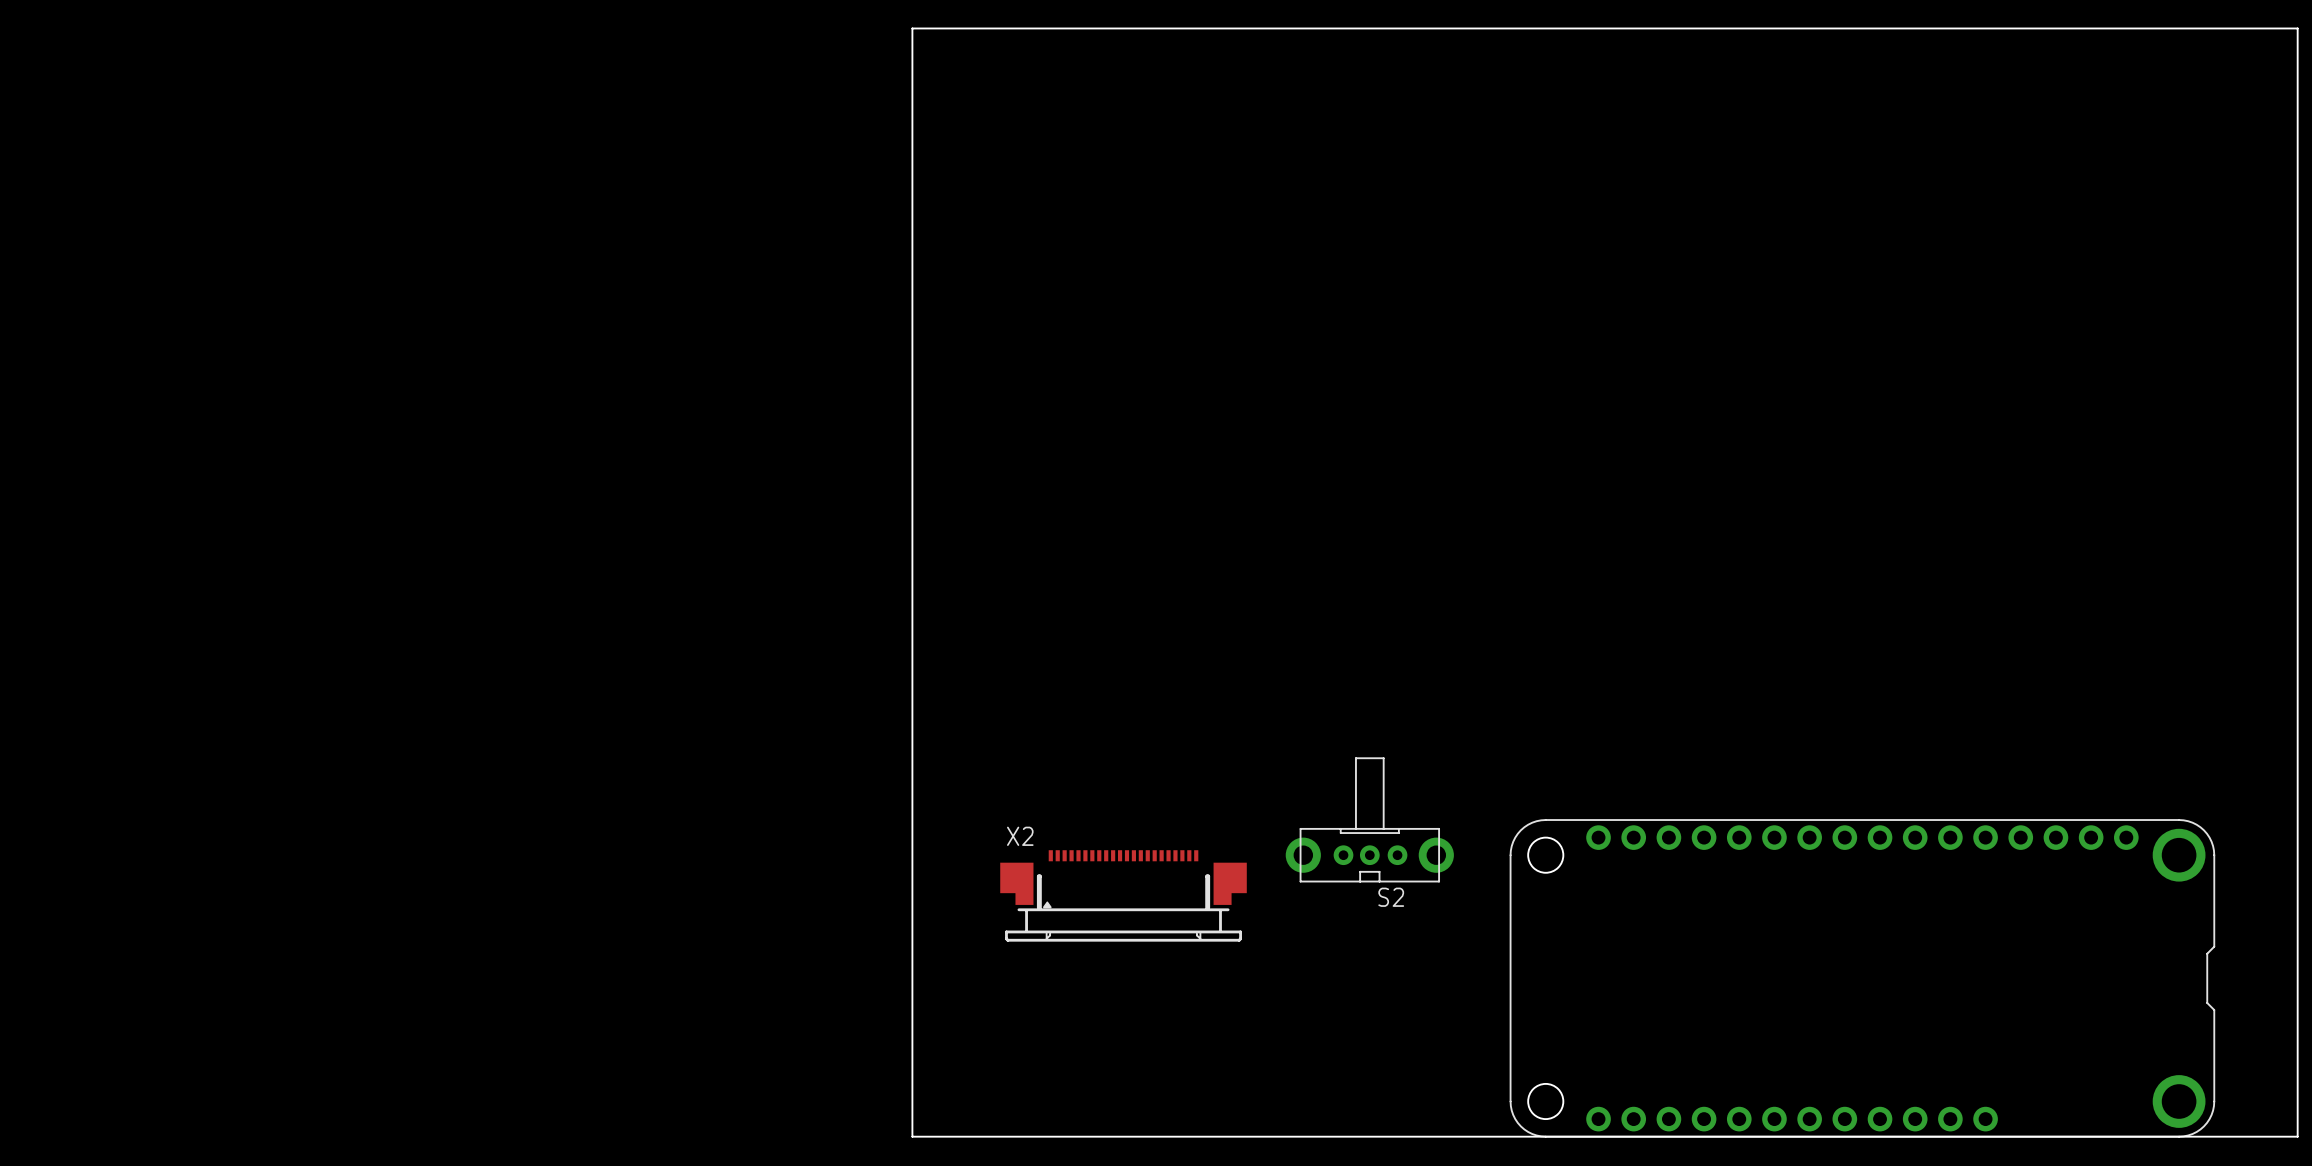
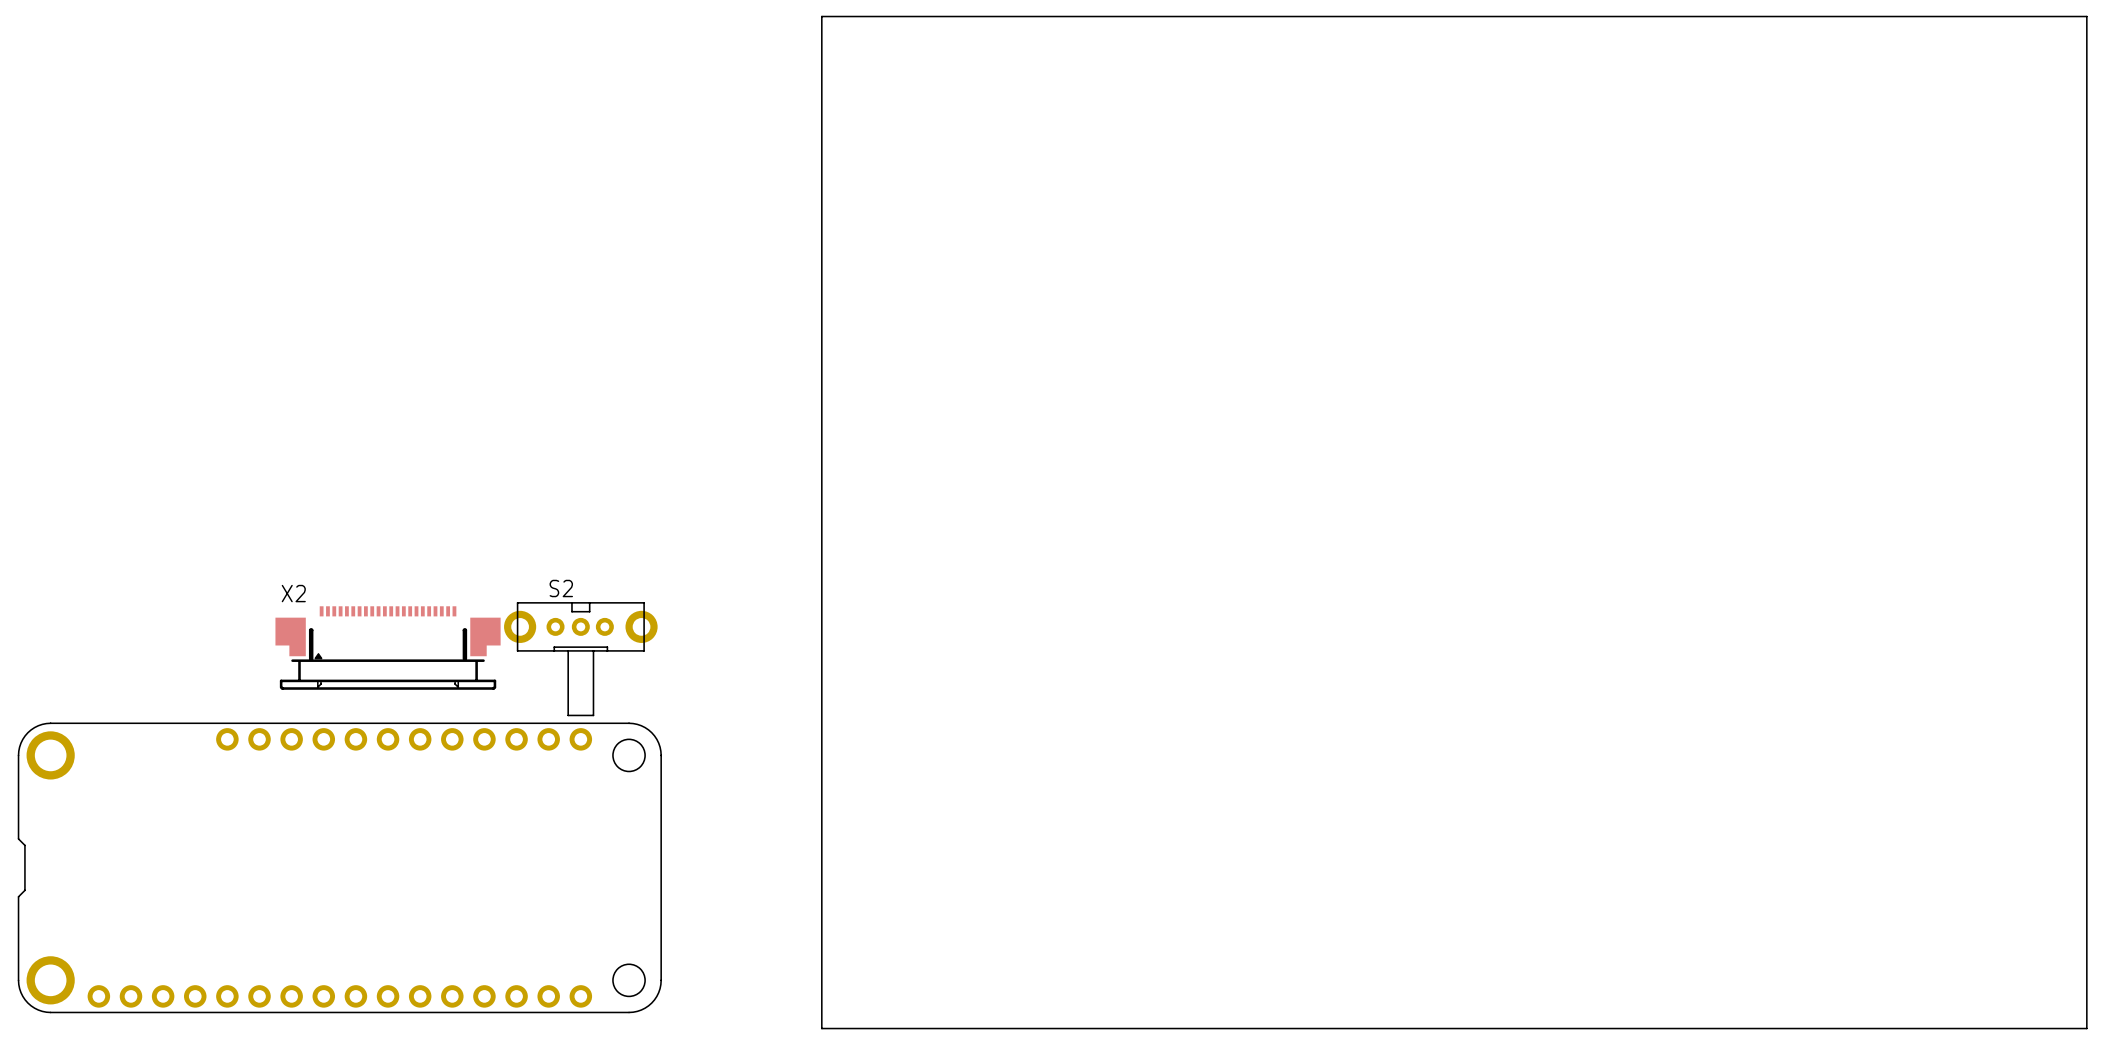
S2 rotation: 0° (1369, 819) -> 180° (580, 659)
S2 position: (1369, 819) -> (580, 659)
X2 position: (1123, 895) -> (388, 648)
part: none -> (339, 867)
part: (1862, 978) -> none

